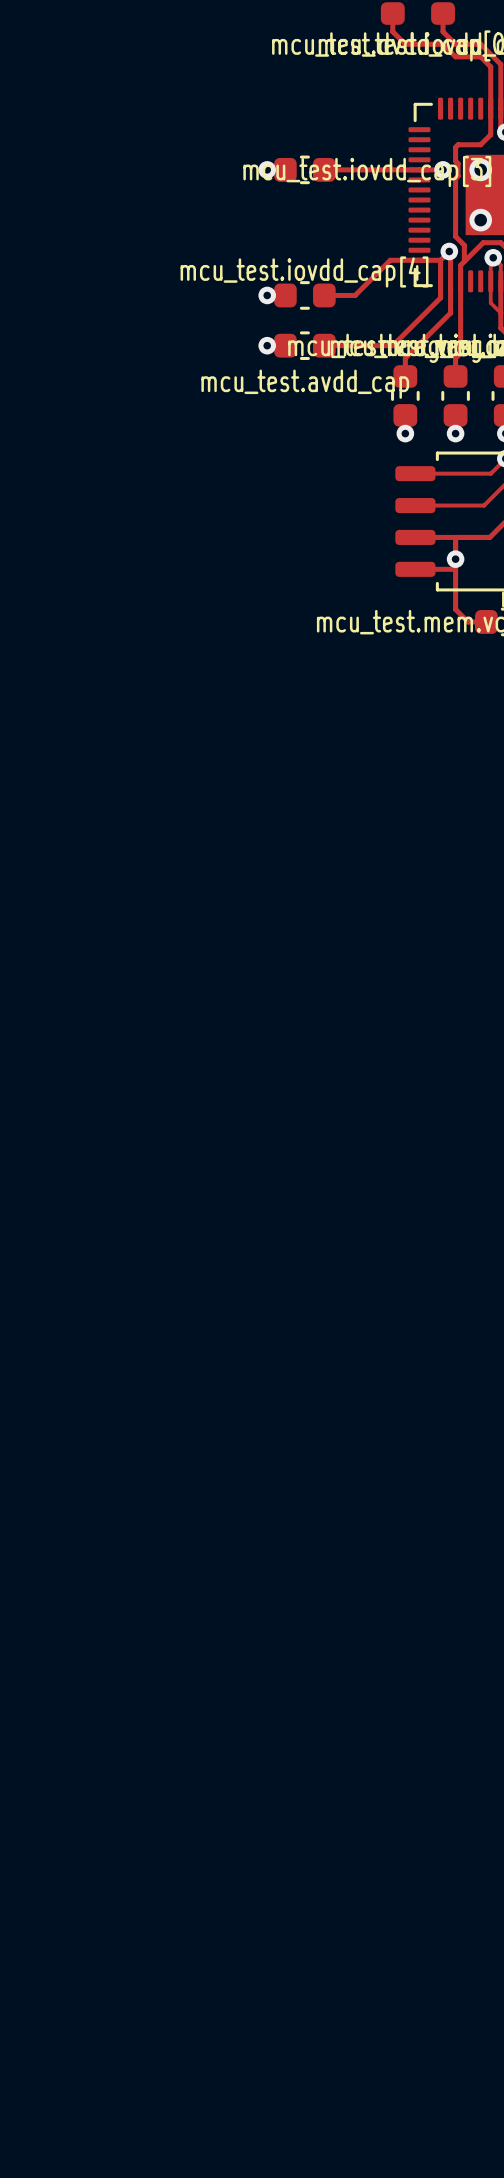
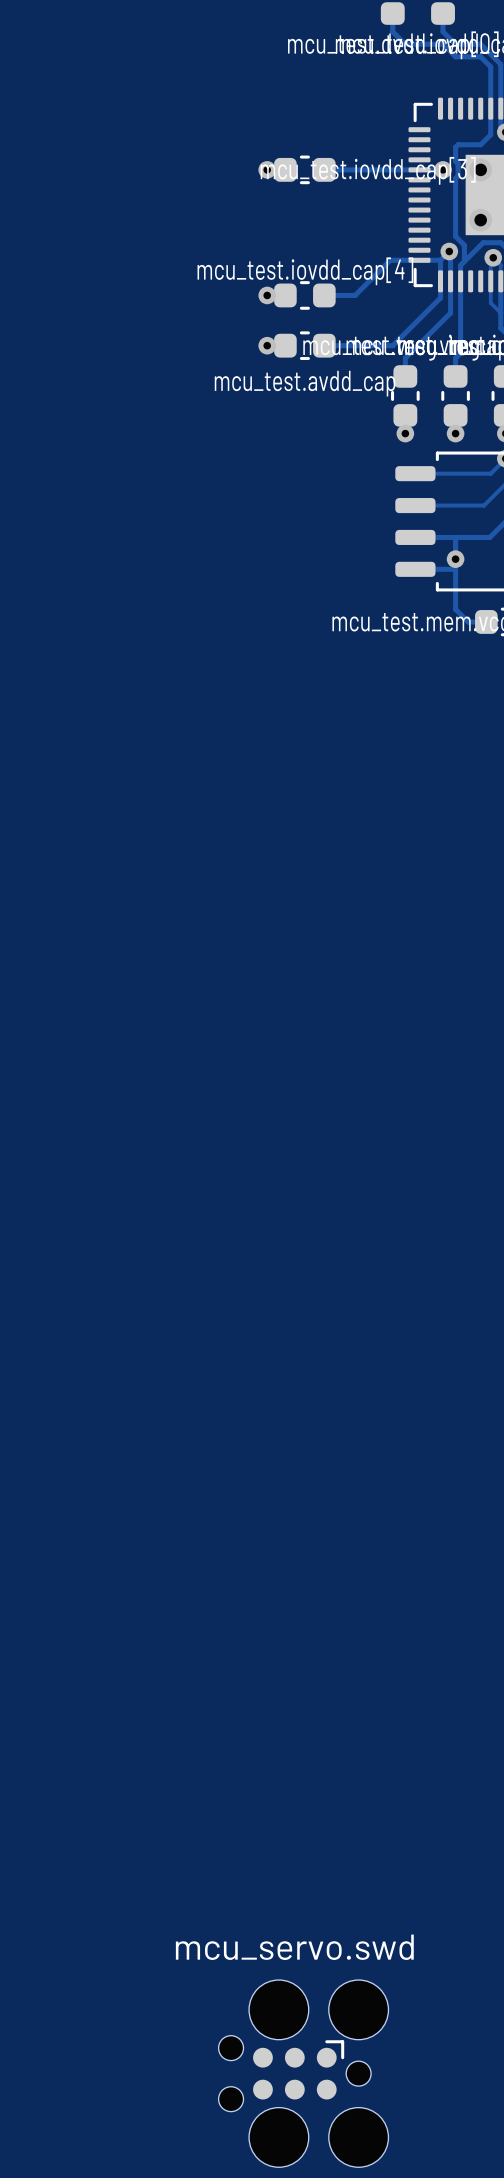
mcu_servo.swd: none -> (303, 2073)

